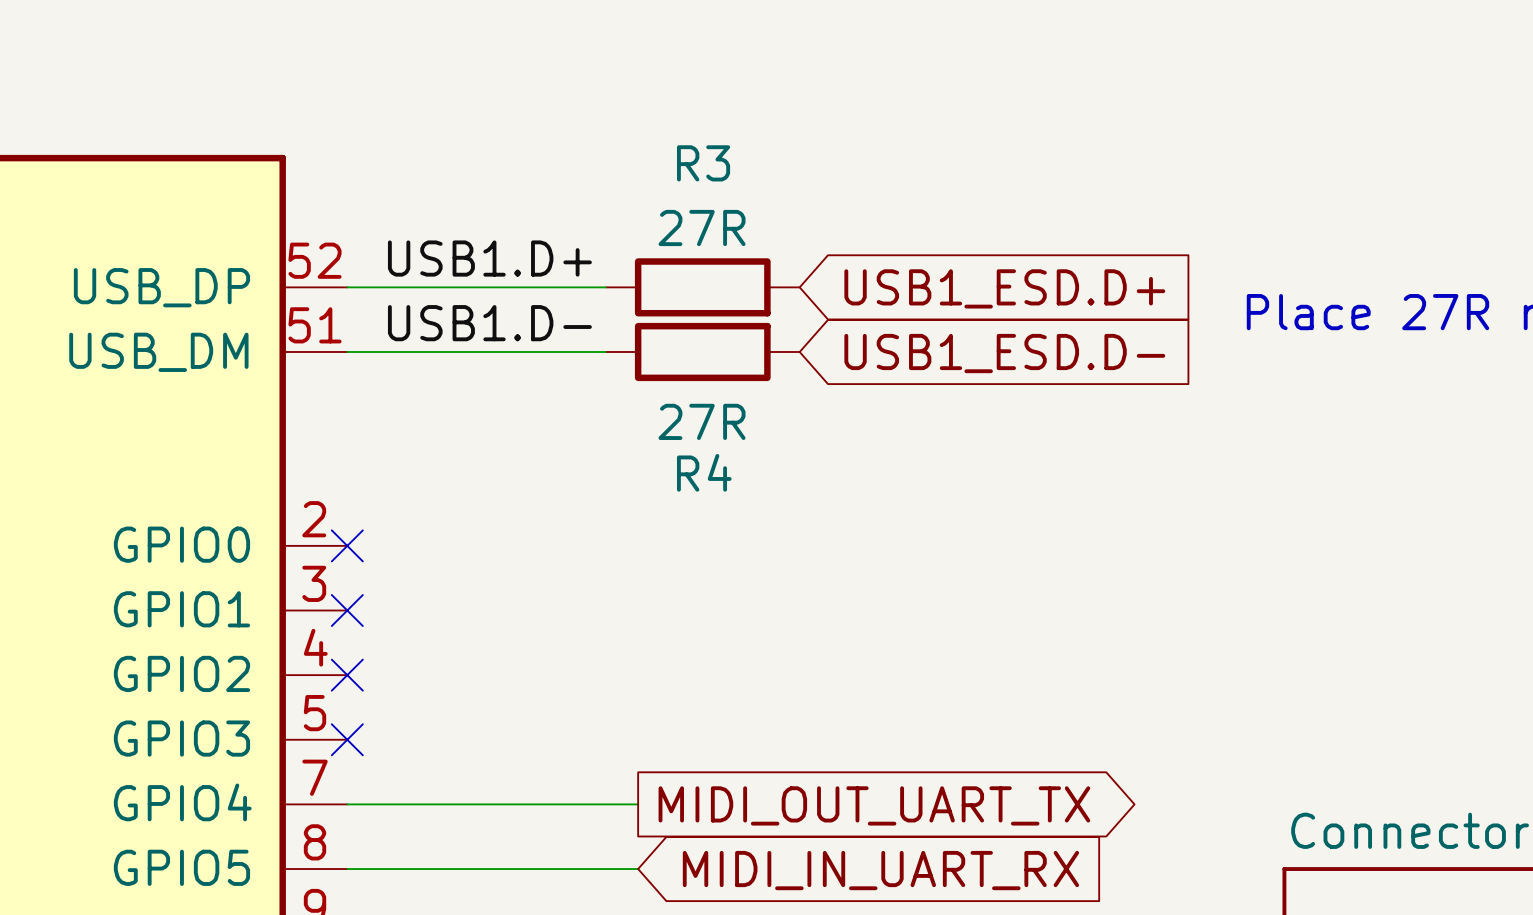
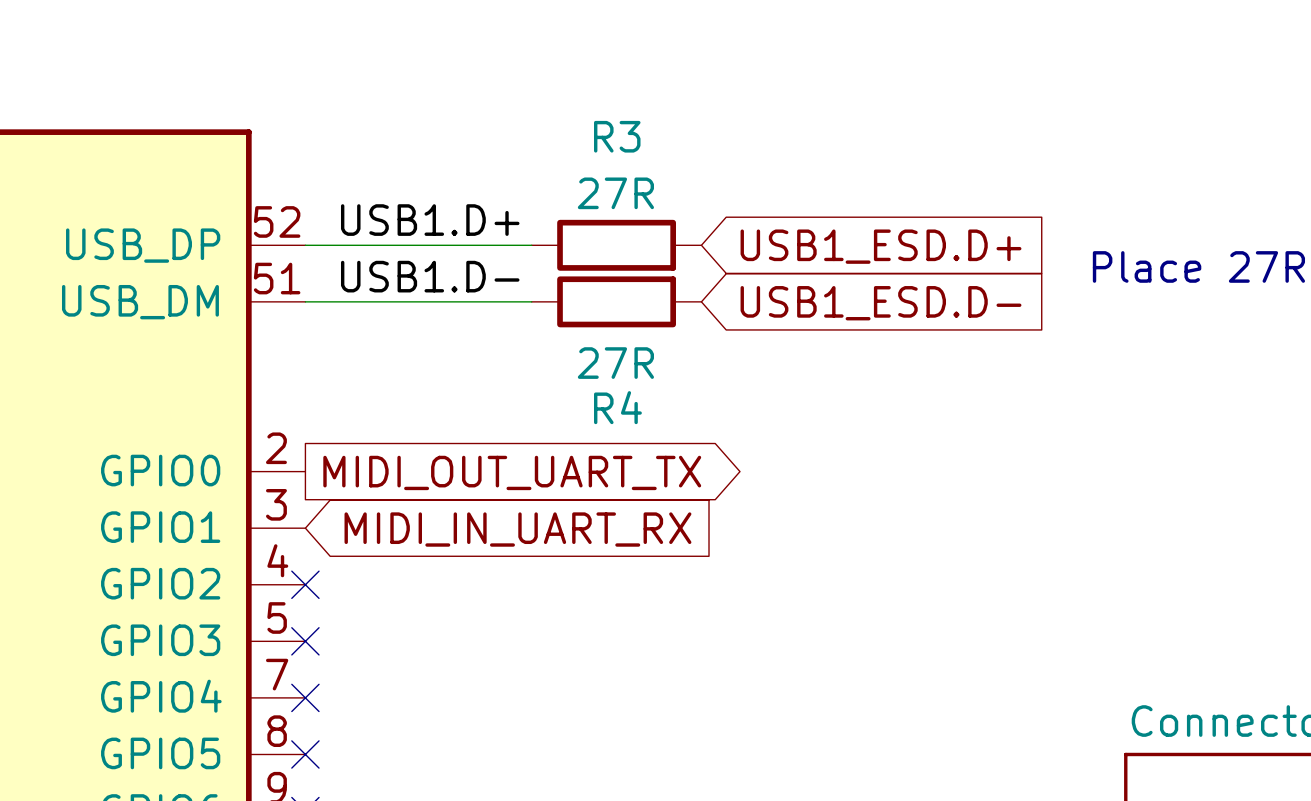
no-connect mark: (347, 545) -> none
no-connect mark: (347, 610) -> none
wire: (347, 804) (638, 804) -> none
no-connect mark: none -> (305, 697)
global label position: MIDI_OUT_UART_TX (874, 805) -> MIDI_OUT_UART_TX (512, 472)
wire: (347, 869) (638, 869) -> none
no-connect mark: none -> (305, 754)
global label position: MIDI_IN_UART_RX (880, 870) -> MIDI_IN_UART_RX (517, 529)

